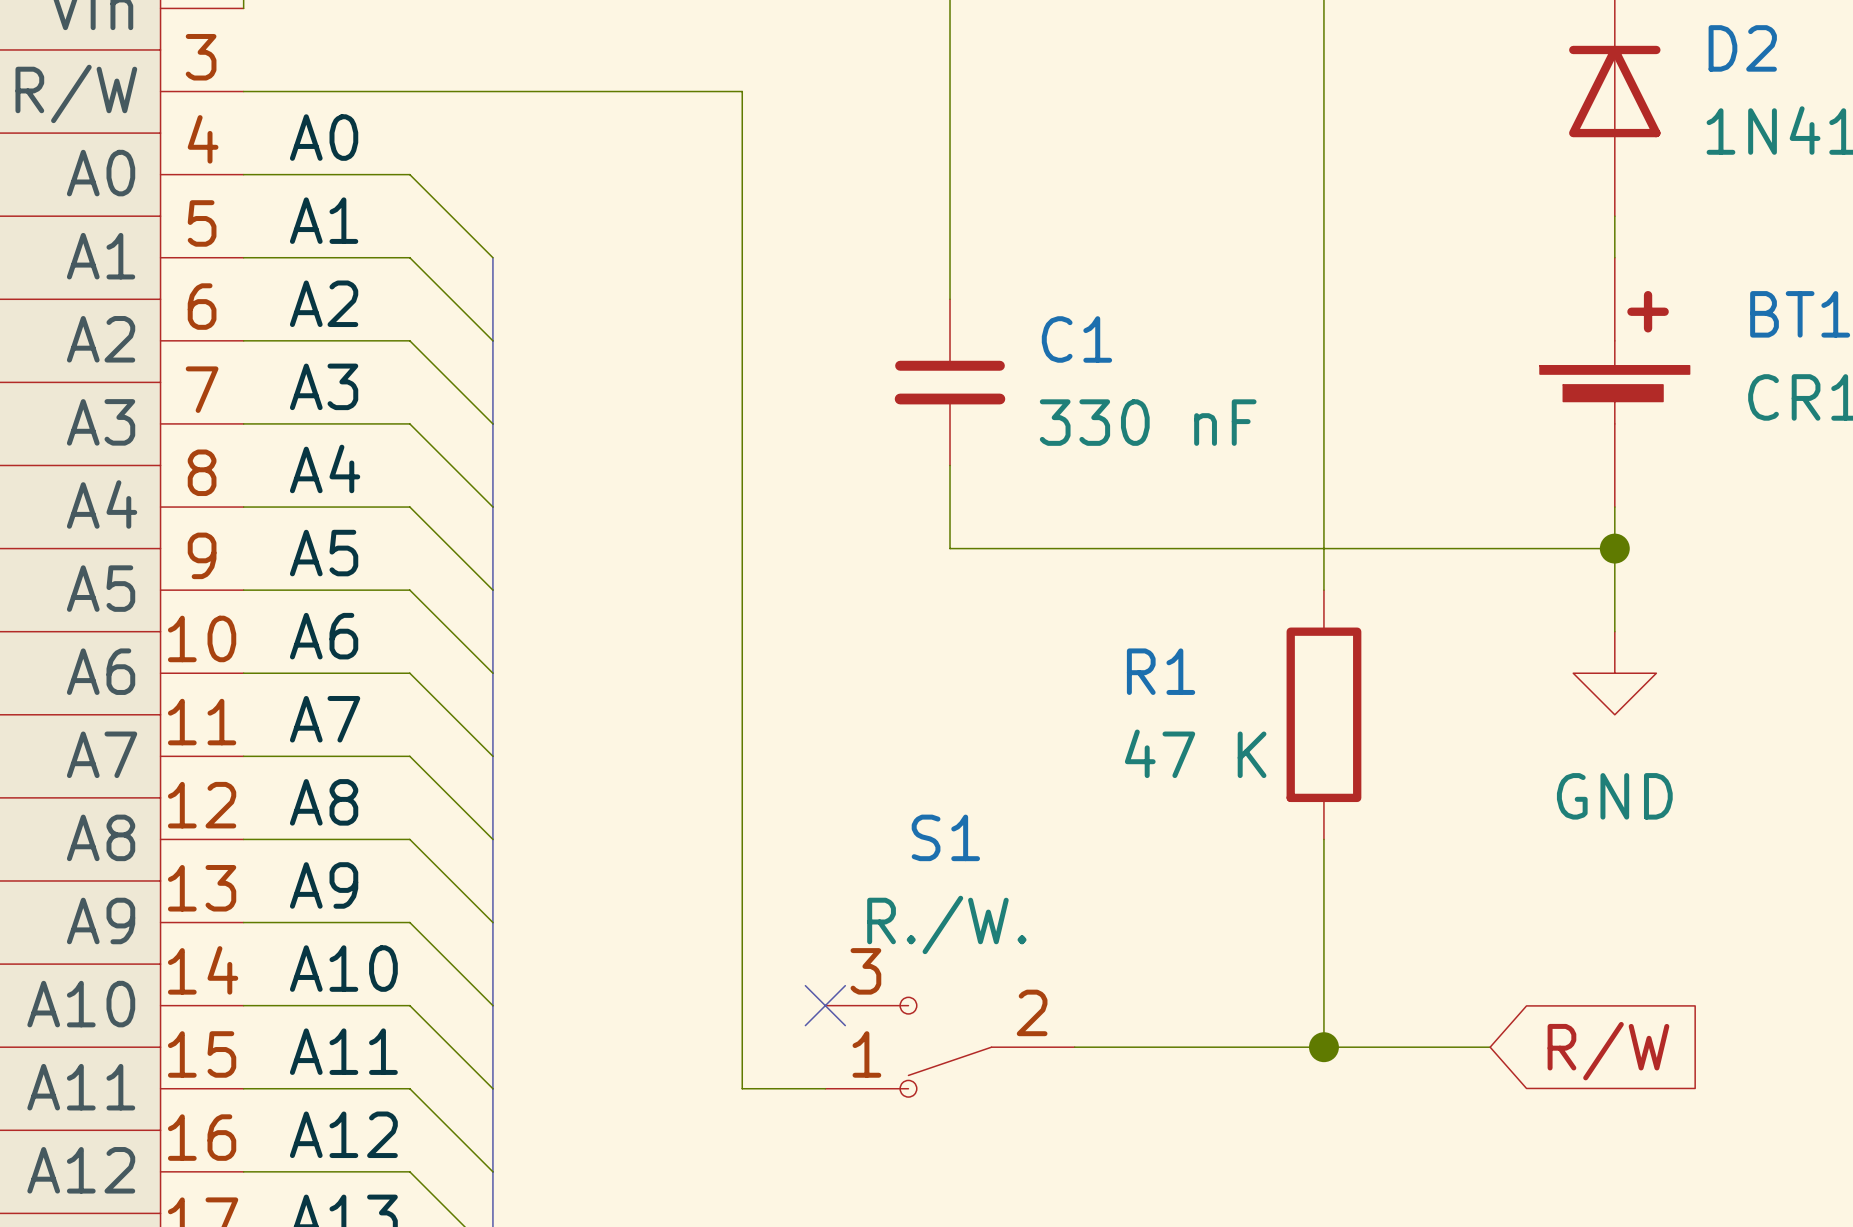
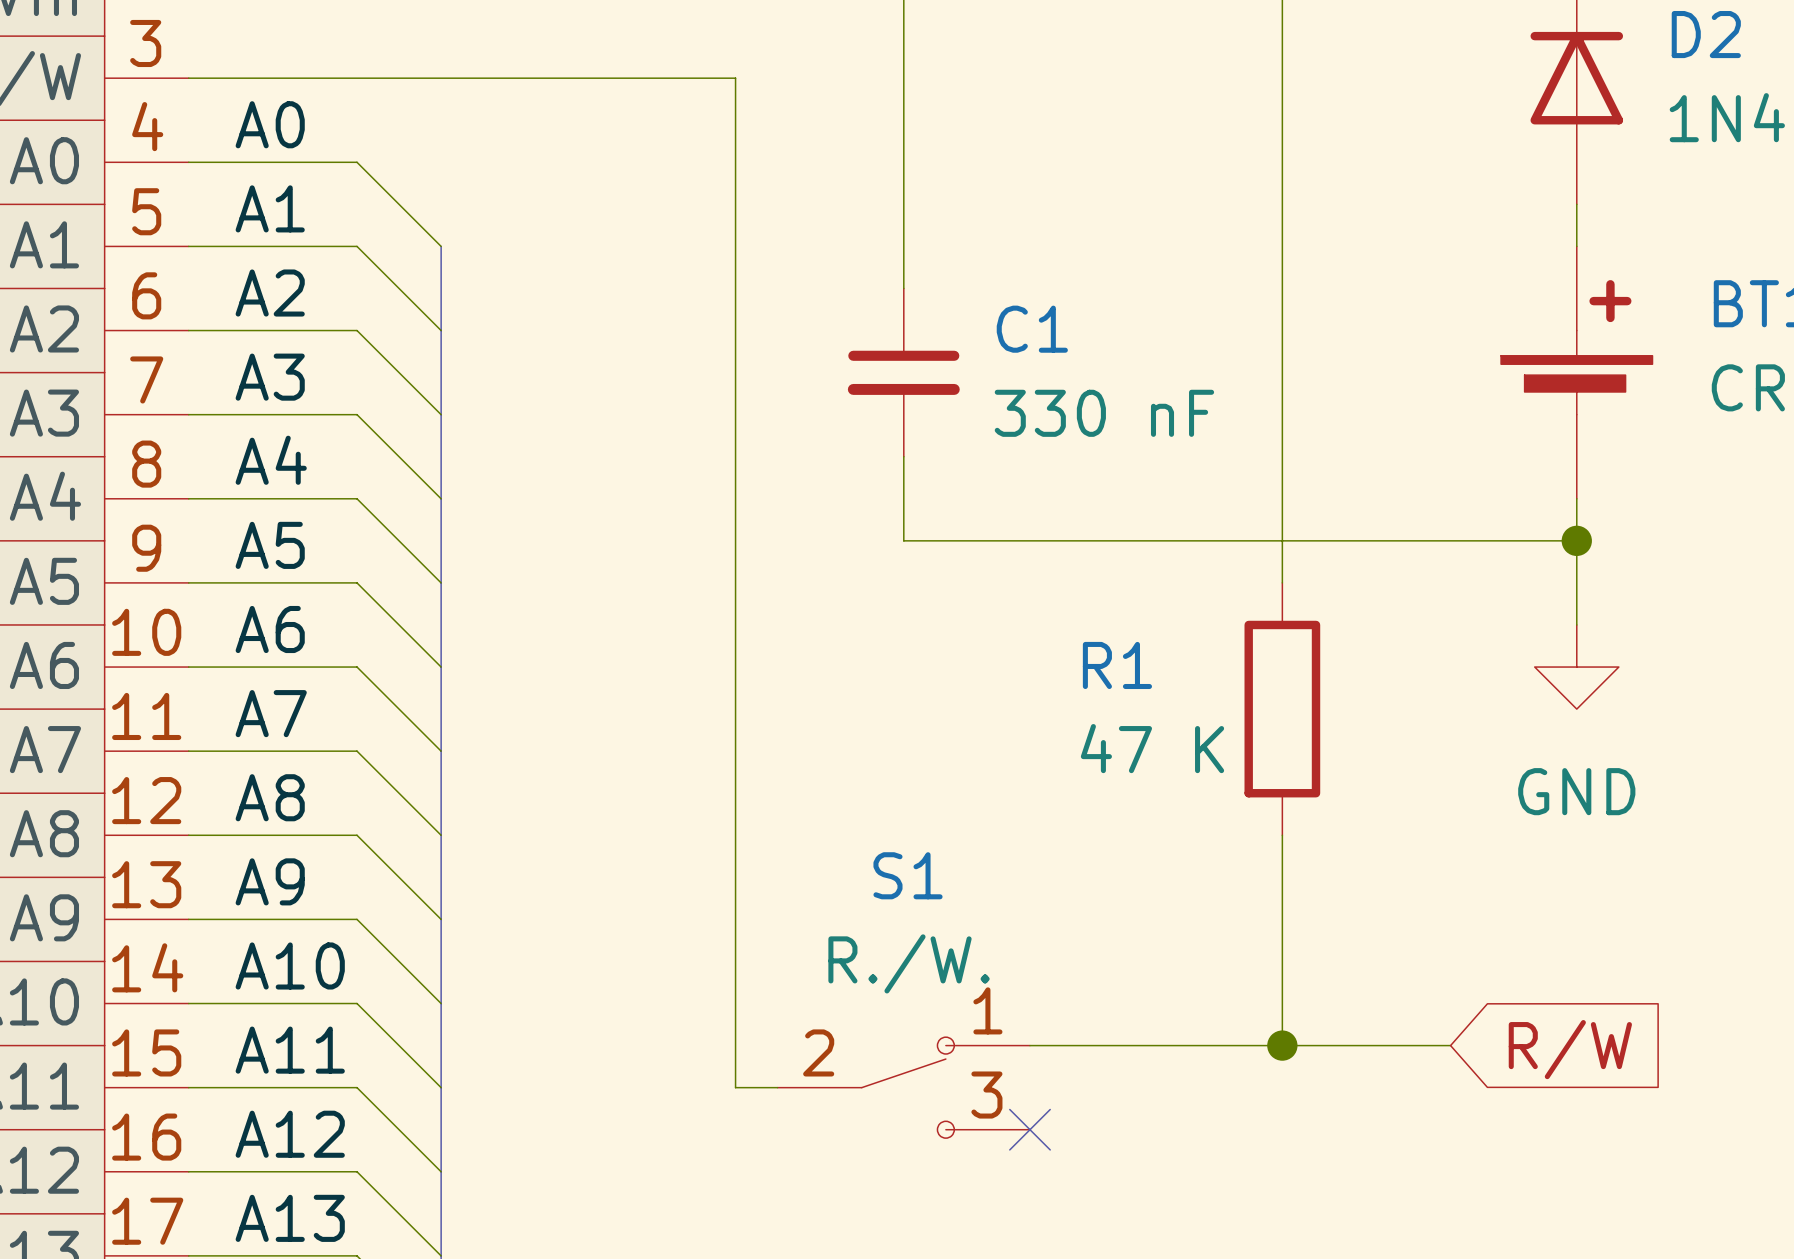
wire: (742, 91) (742, 1088) (783, 1088) -> (693, 78) (735, 78) (735, 1087)
no-connect mark: (825, 1005) -> none
S1 rotation: 0° (945, 1047) -> 180° (908, 1087)
no-connect mark: none -> (1029, 1129)

